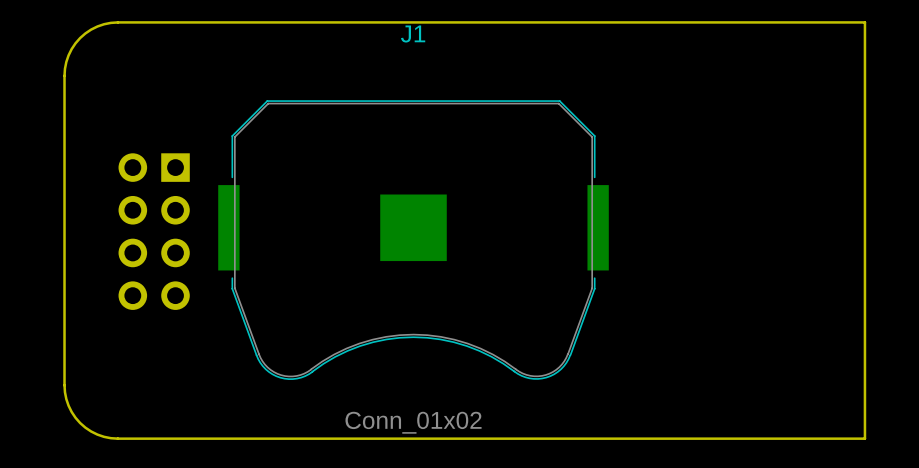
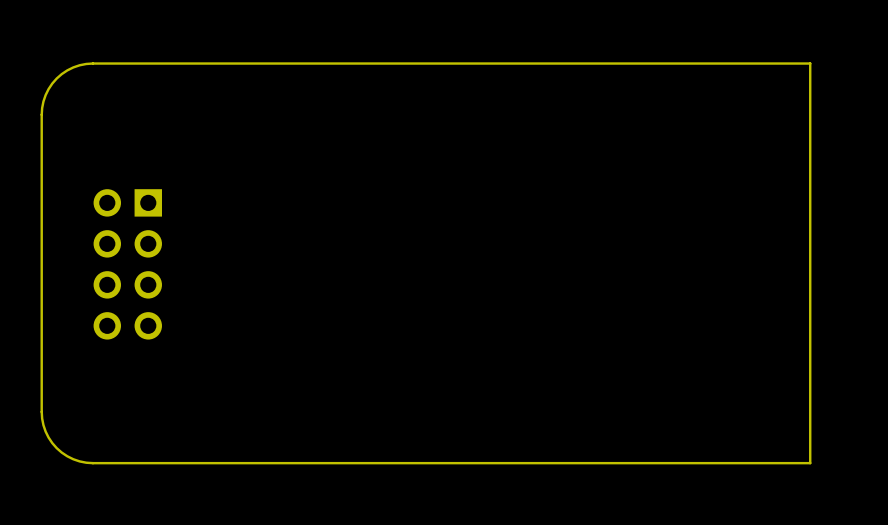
J1: Conn_01x02 (413, 240) -> none

